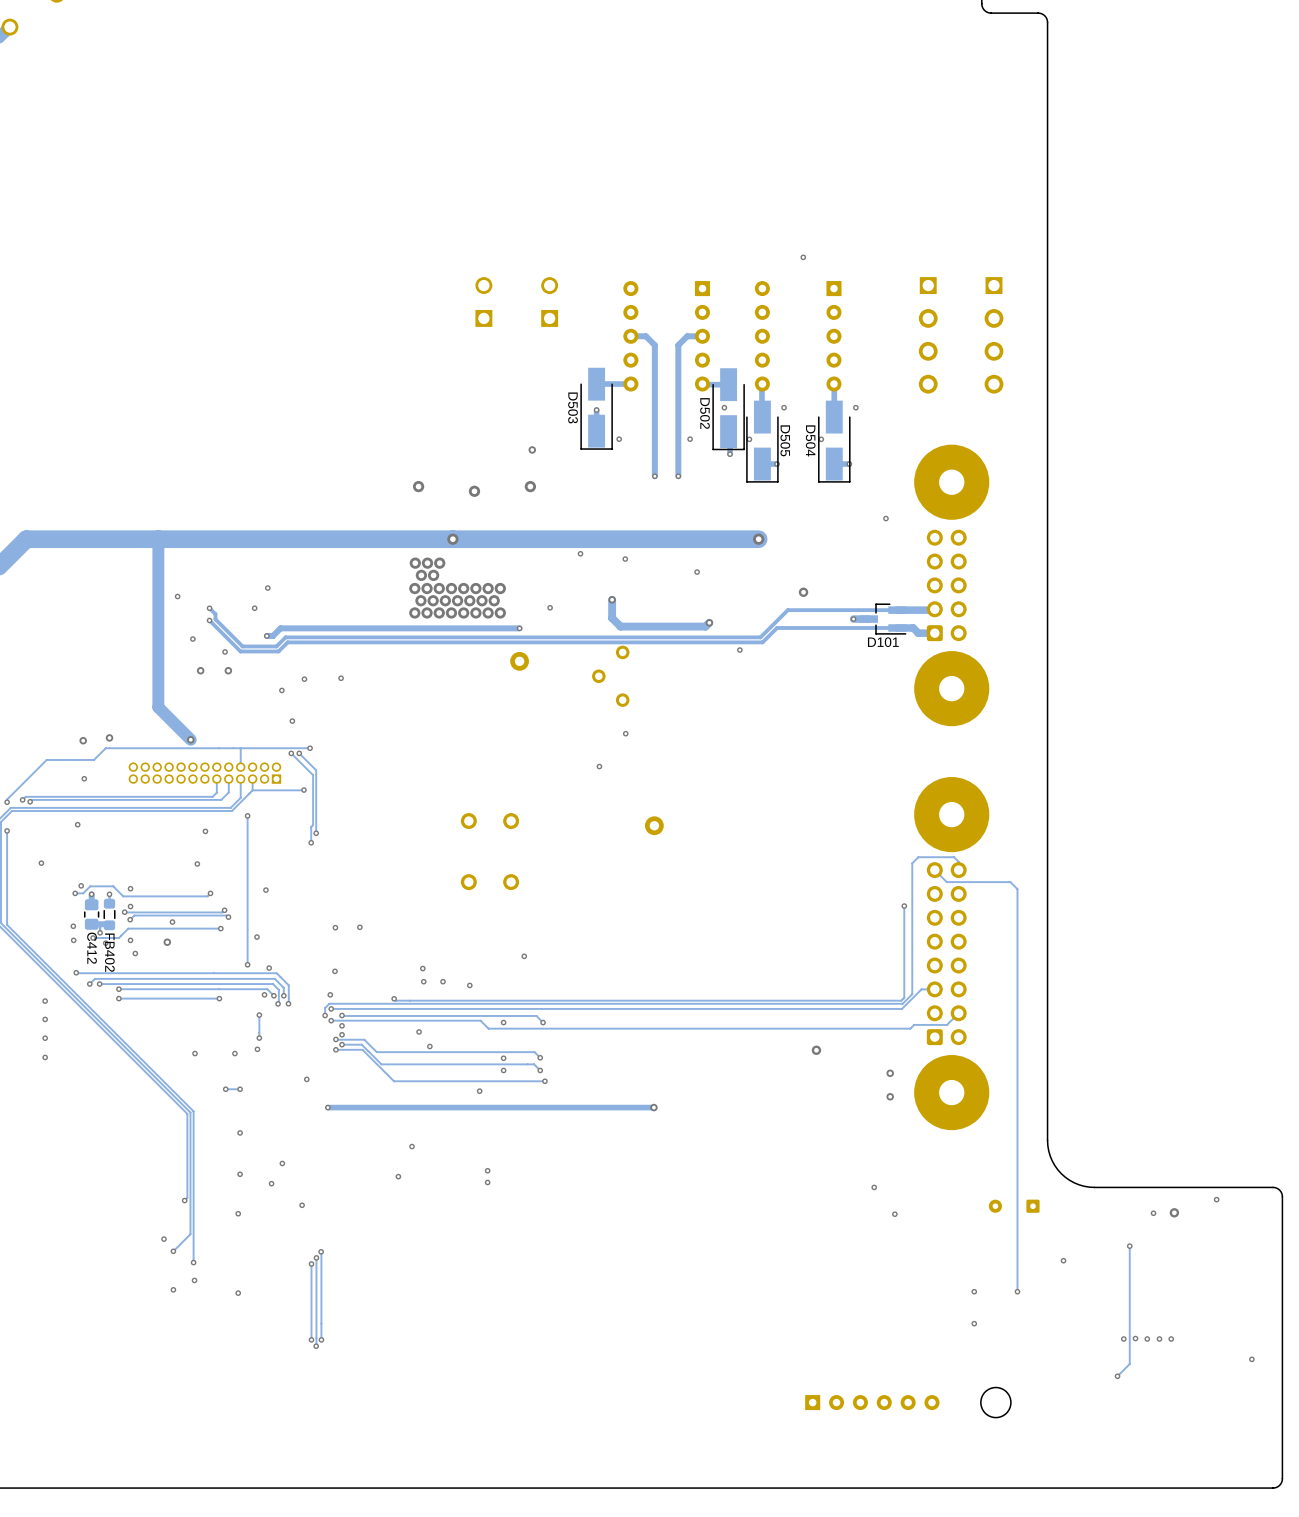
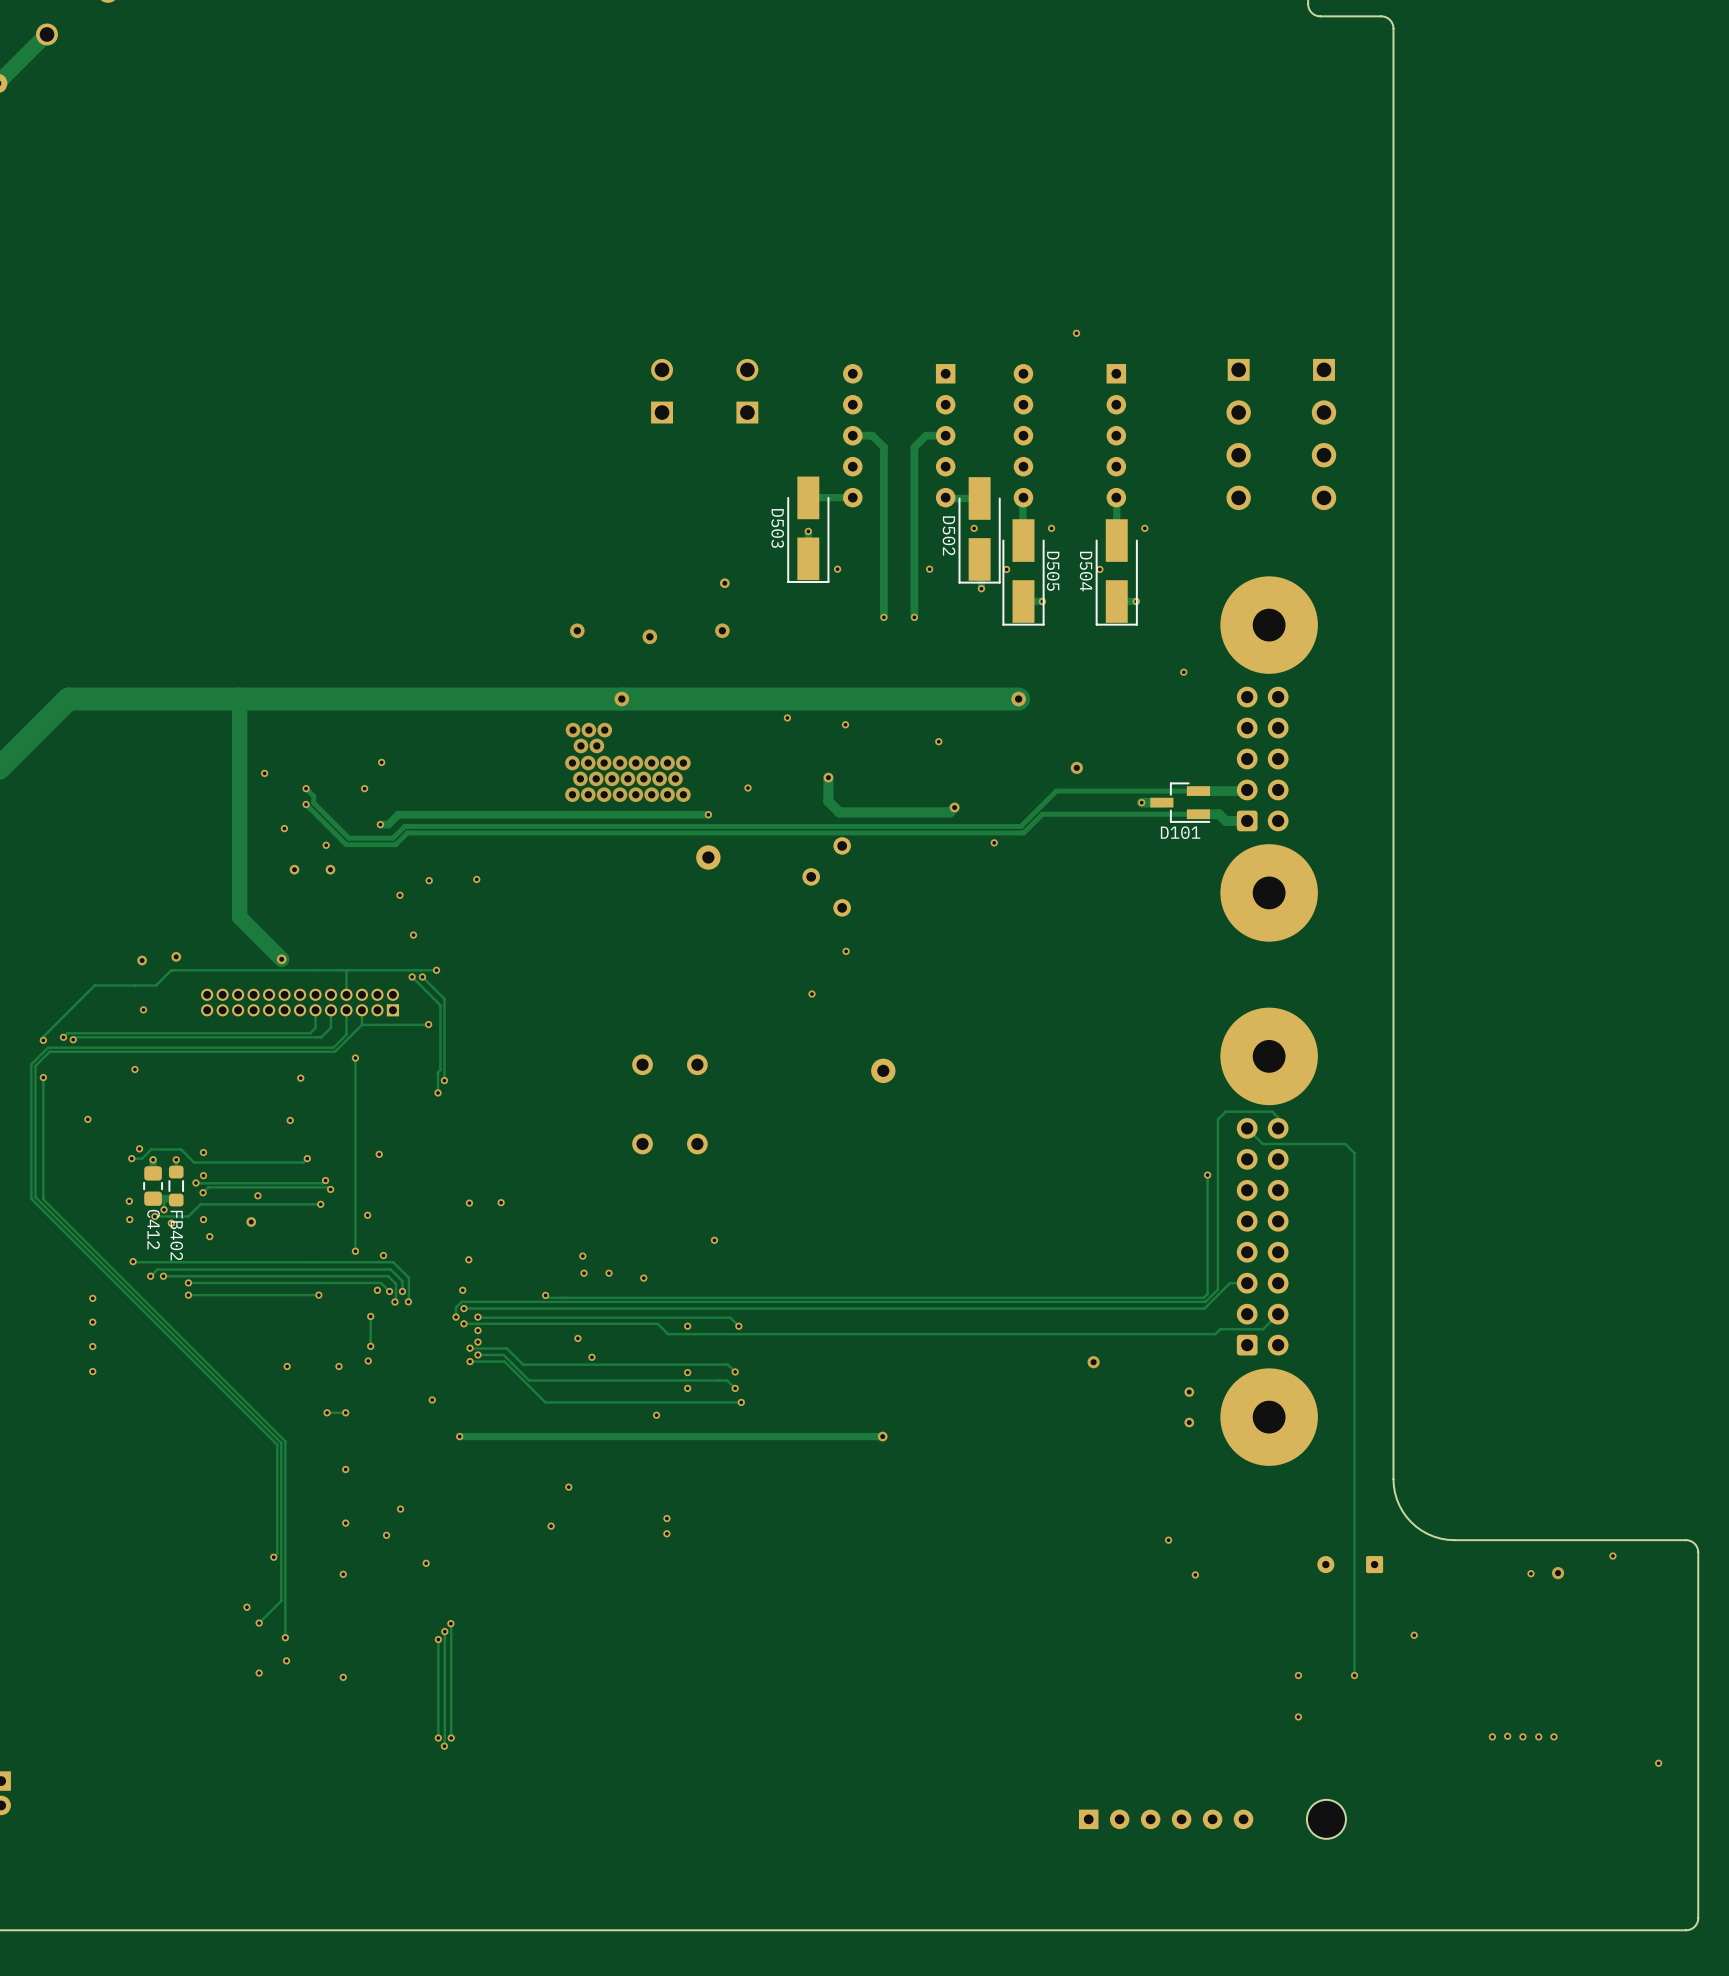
track: (1129, 1246) (1129, 1364) (1117, 1376) -> none
via: (1129, 1246) -> none
via: (1117, 1376) -> none

